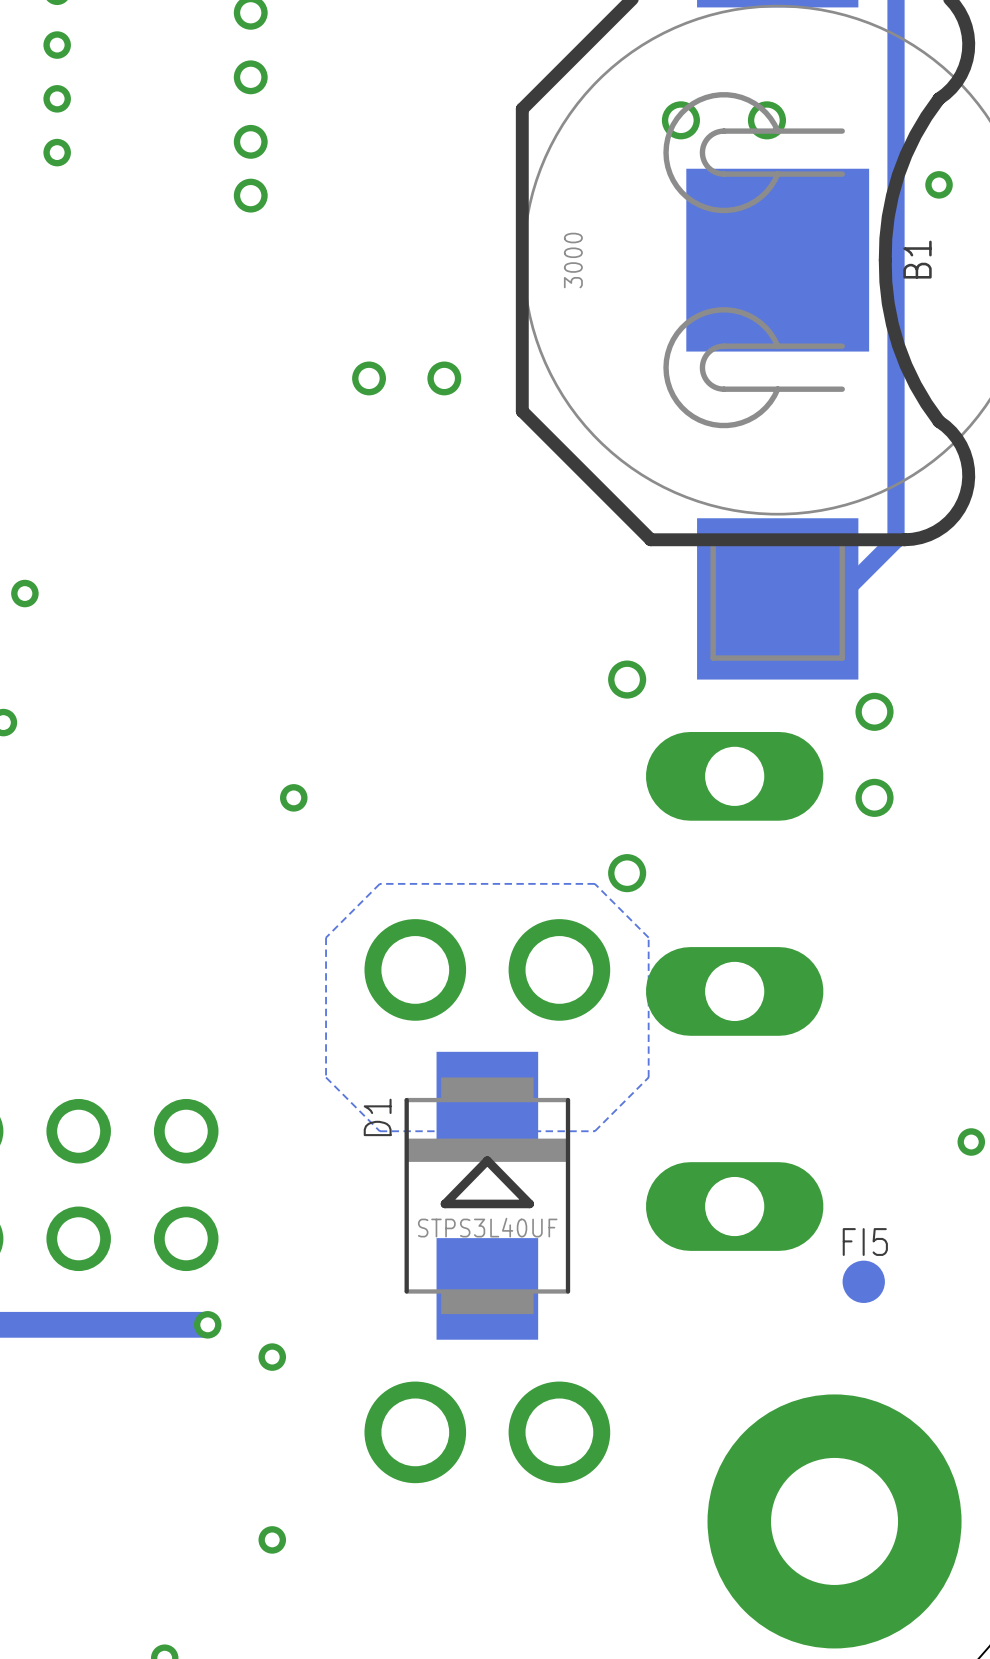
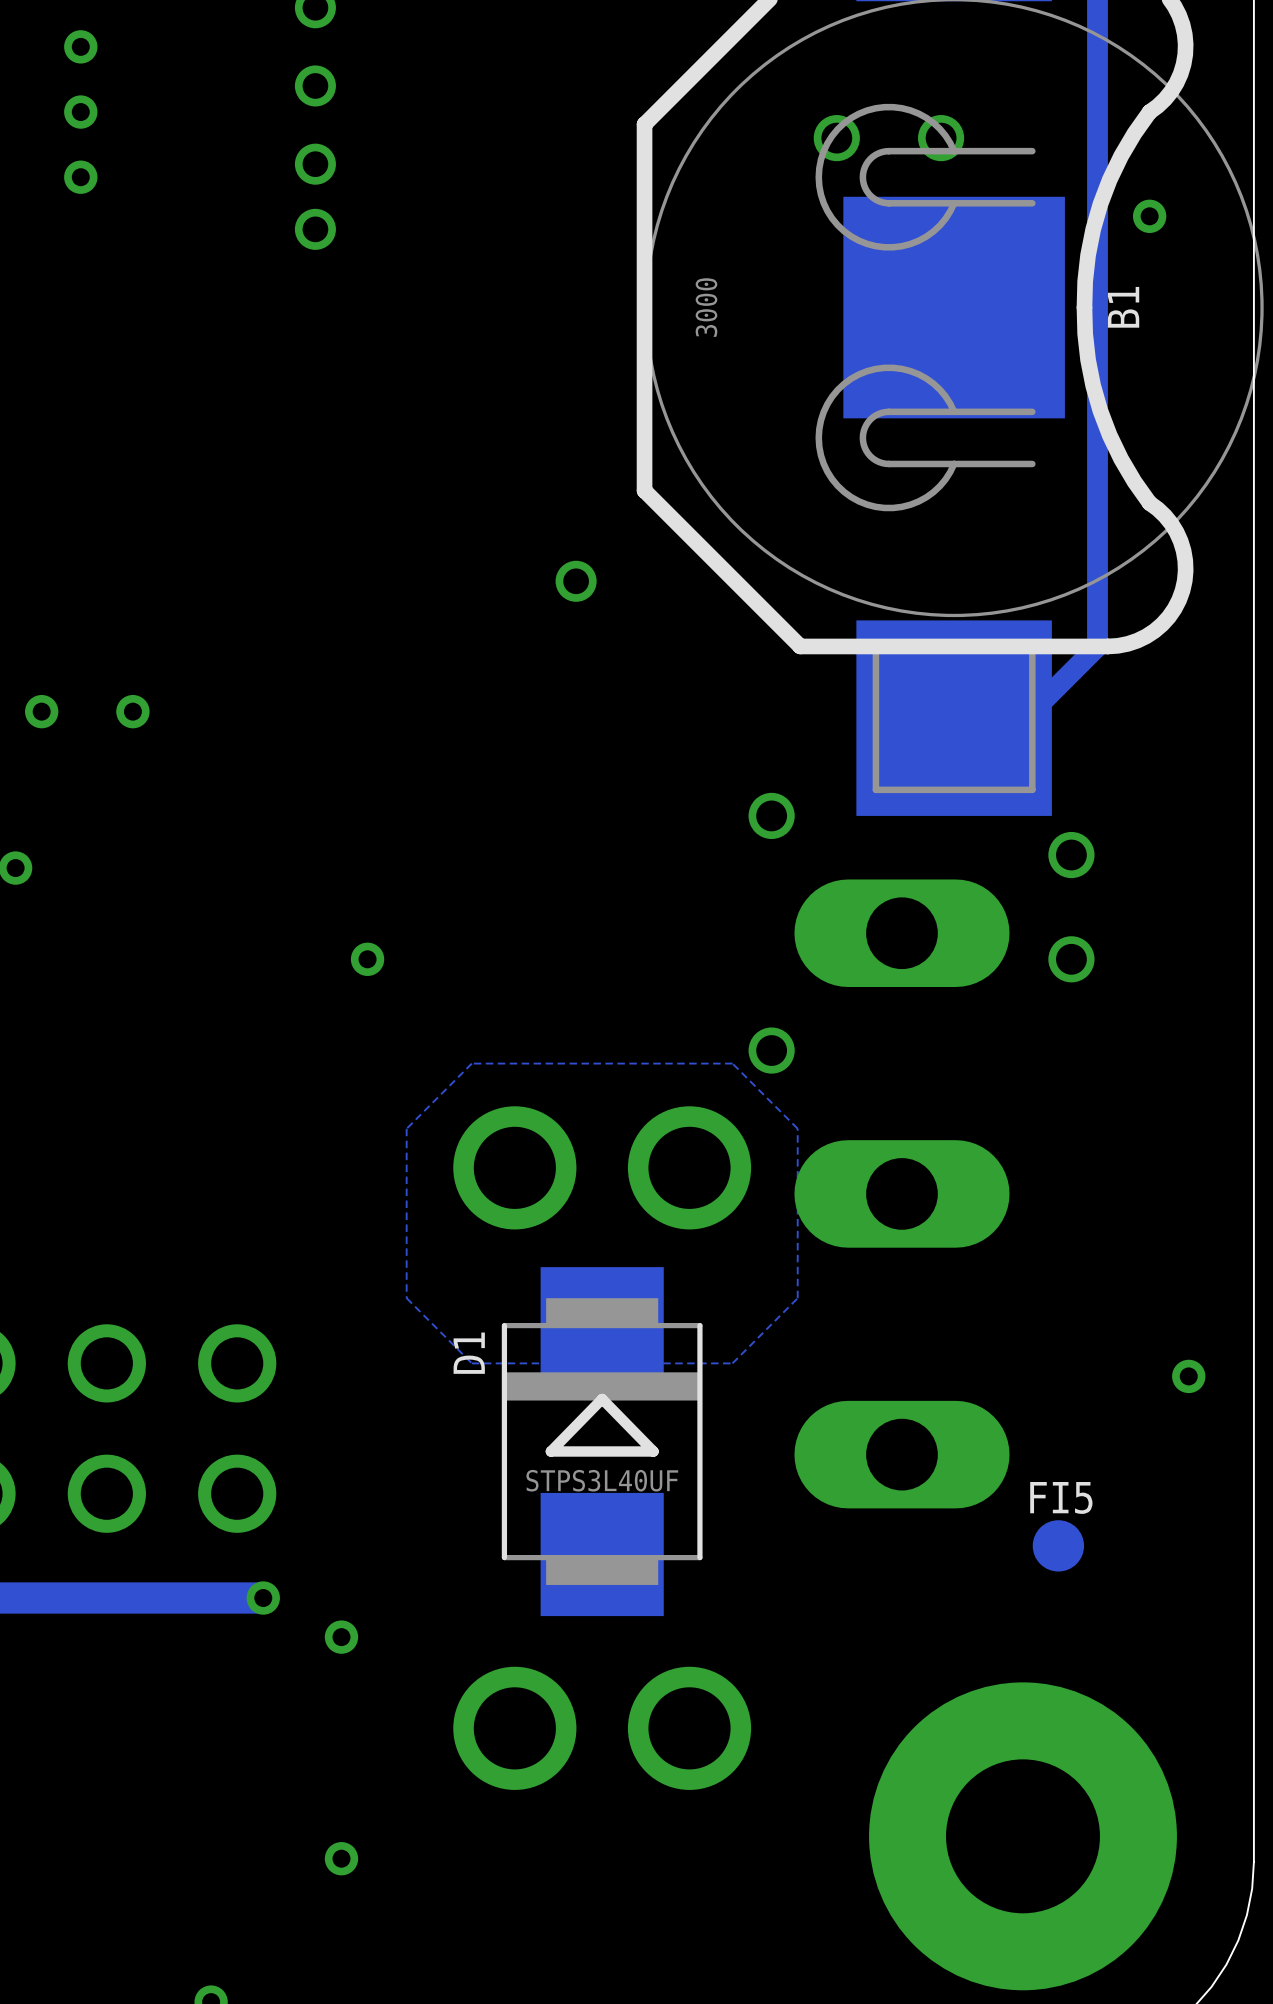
via: (369, 378) -> none
via: (444, 378) -> none
via: none -> (576, 581)
via: none -> (132, 711)

